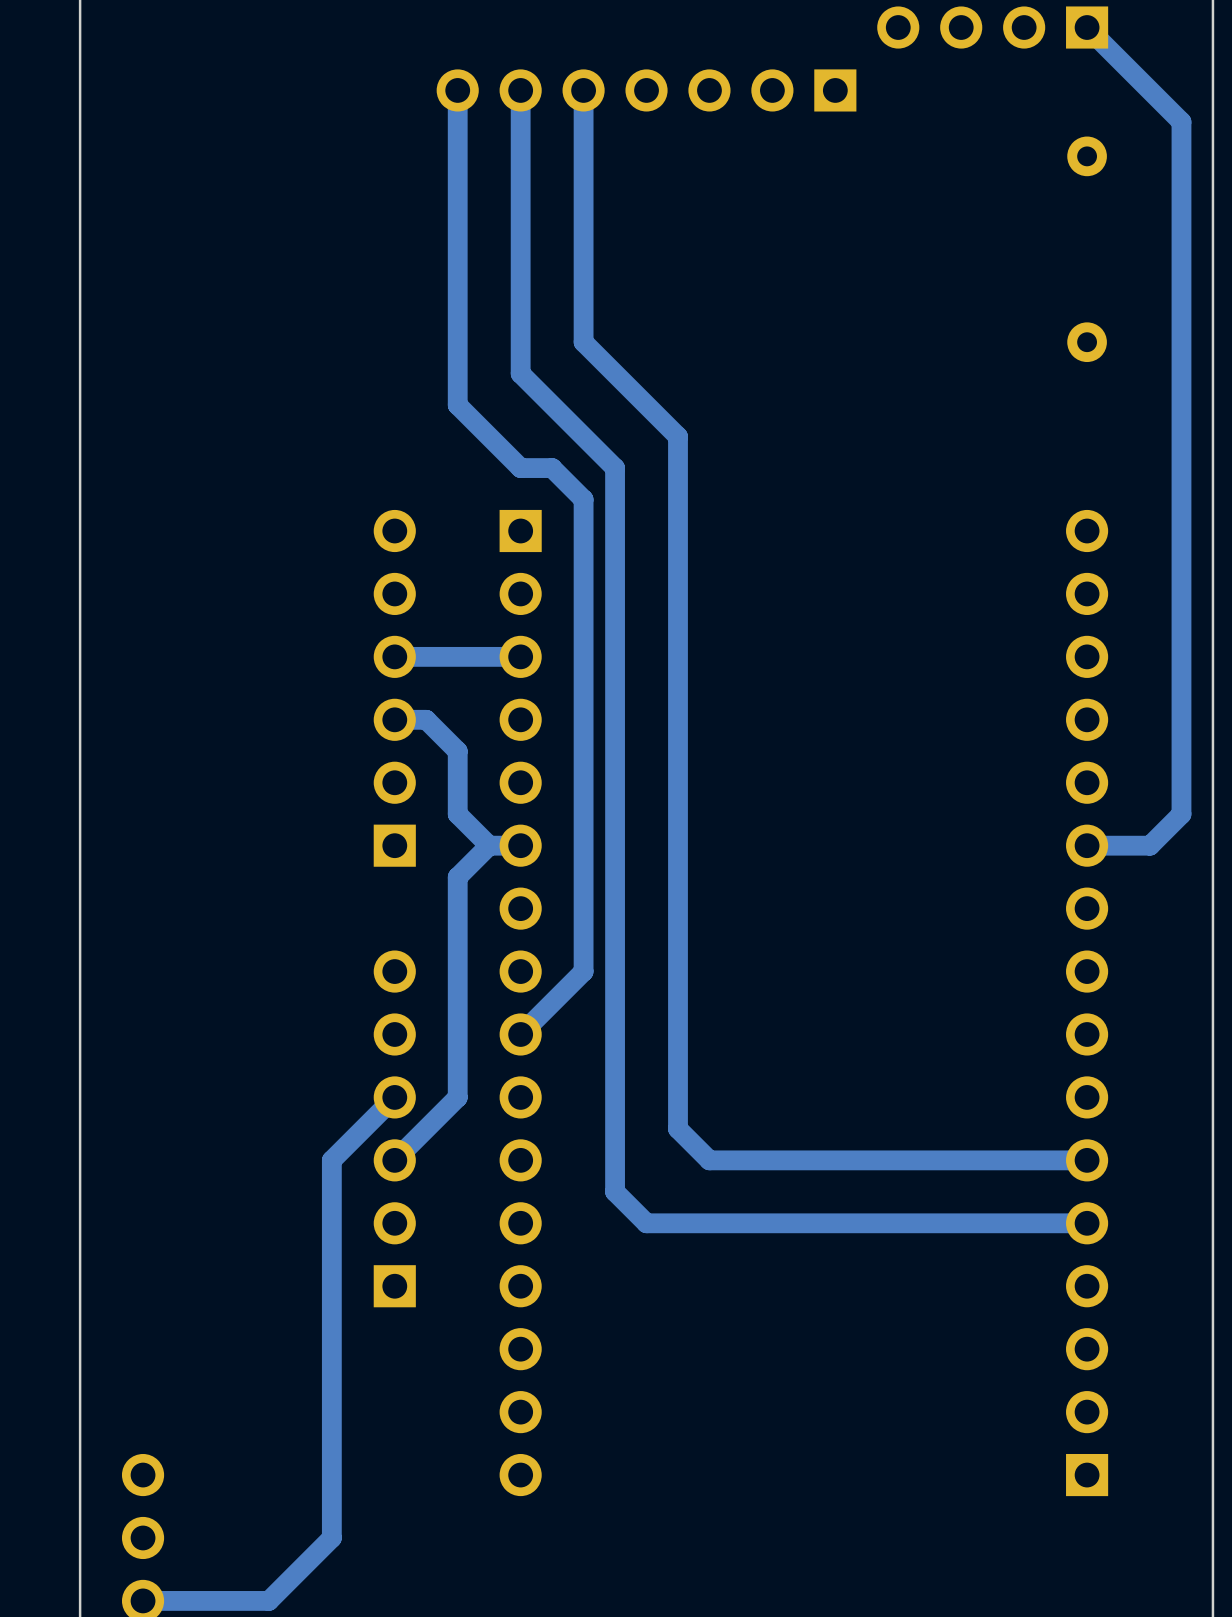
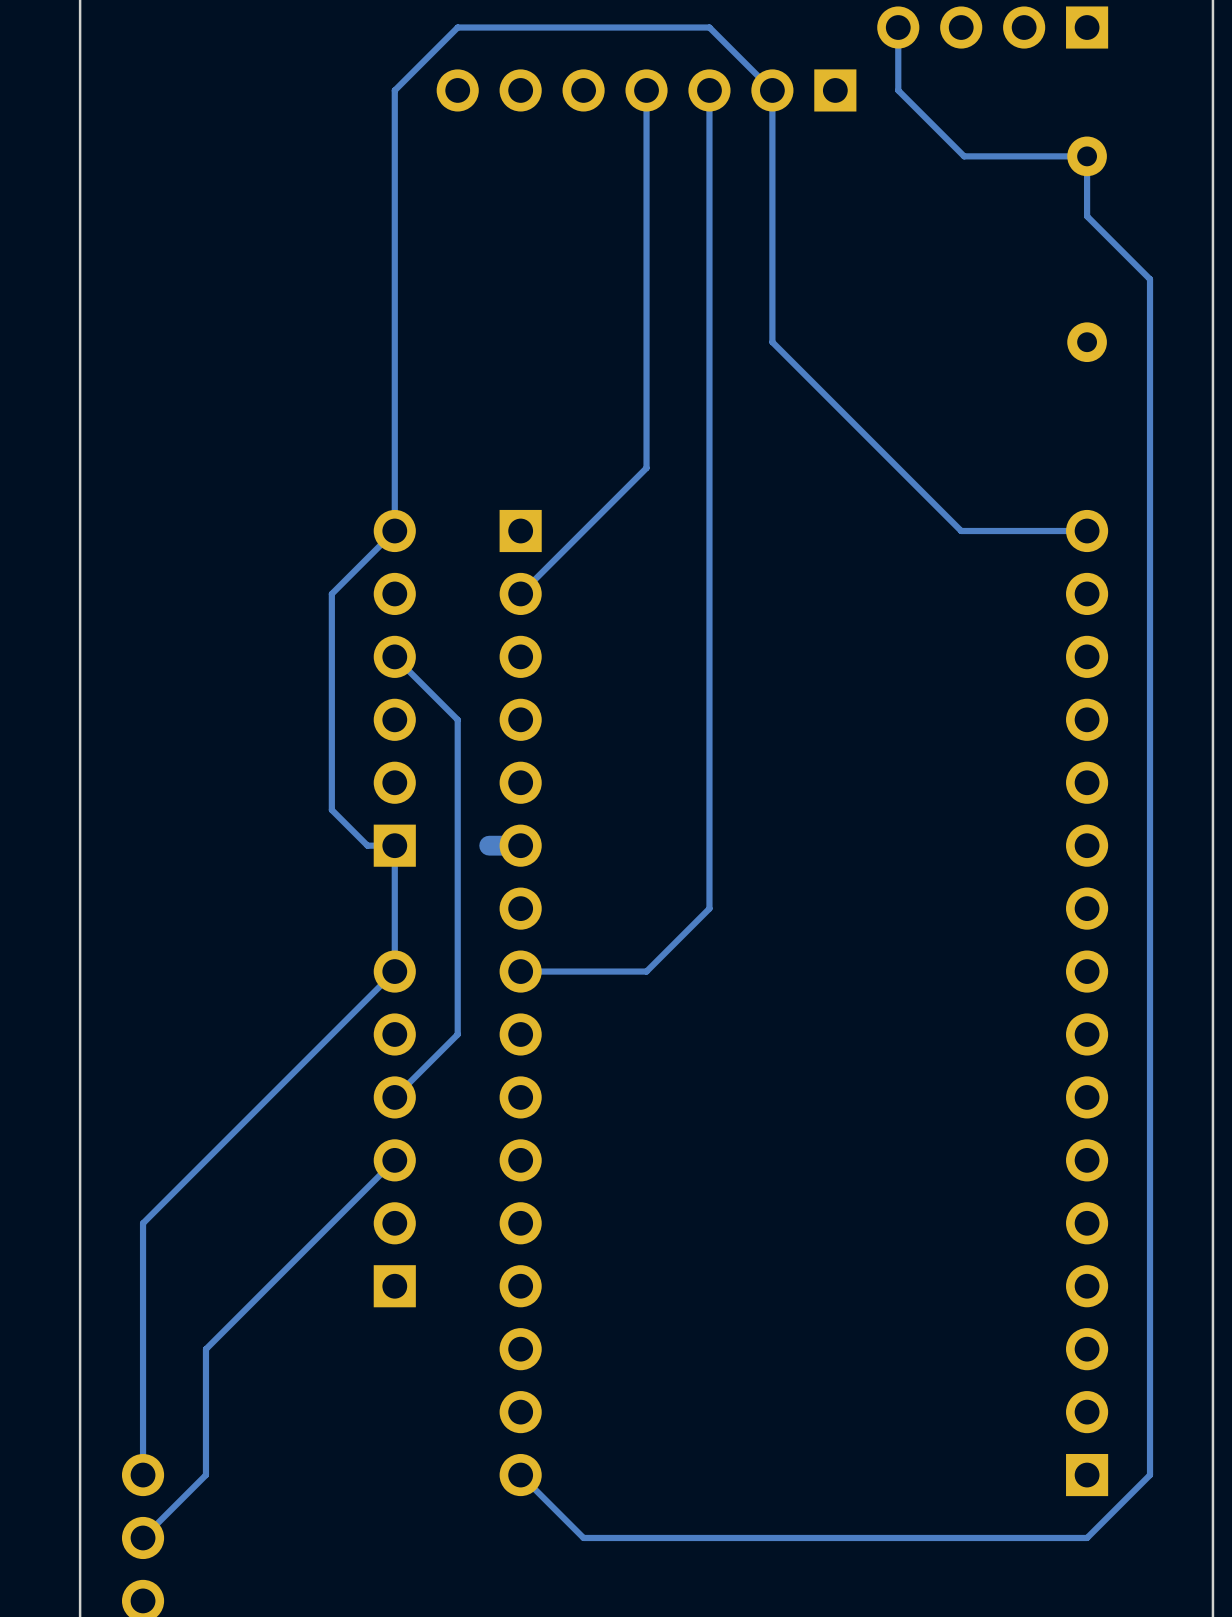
track: none -> (898, 27) (898, 90) (964, 156) (1087, 156) (1087, 216) (1150, 279) (1150, 1475) (1087, 1537) (583, 1537) (520, 1475)
track: (1087, 27) (1181, 121) (1181, 814) (1150, 845) (1087, 845) -> none
track: (457, 90) (457, 405) (520, 468) (552, 468) (583, 499) (583, 971) (520, 1034) -> none
track: (520, 90) (520, 373) (615, 468) (615, 1191) (646, 1223) (1087, 1223) -> none
track: (583, 90) (583, 342) (678, 436) (678, 1128) (709, 1160) (1087, 1160) -> none
track: none -> (646, 90) (646, 468) (520, 593)
track: none -> (709, 90) (709, 908) (646, 971) (520, 971)
track: none -> (1087, 531) (961, 531) (772, 342) (772, 90) (709, 27) (457, 27) (394, 90) (394, 531) (331, 593) (331, 810) (367, 845) (394, 845) (394, 971) (143, 1223) (143, 1475)
track: (520, 656) (394, 656) -> none
track: (394, 719) (426, 719) (457, 751) -> (394, 656) (457, 719) (457, 751)
track width: thick (457, 751) (457, 814) -> thin (457, 751) (457, 814)
track: (457, 814) (489, 845) (457, 877) -> (457, 814) (457, 877)
track width: thick (457, 877) (457, 1034) -> thin (457, 877) (457, 1034)
track: (457, 1034) (457, 1097) (394, 1160) -> (457, 1034) (394, 1097)
track: (394, 1097) (331, 1160) (331, 1537) (268, 1600) (143, 1600) -> none
track: none -> (394, 1160) (205, 1349) (205, 1475) (143, 1537)

